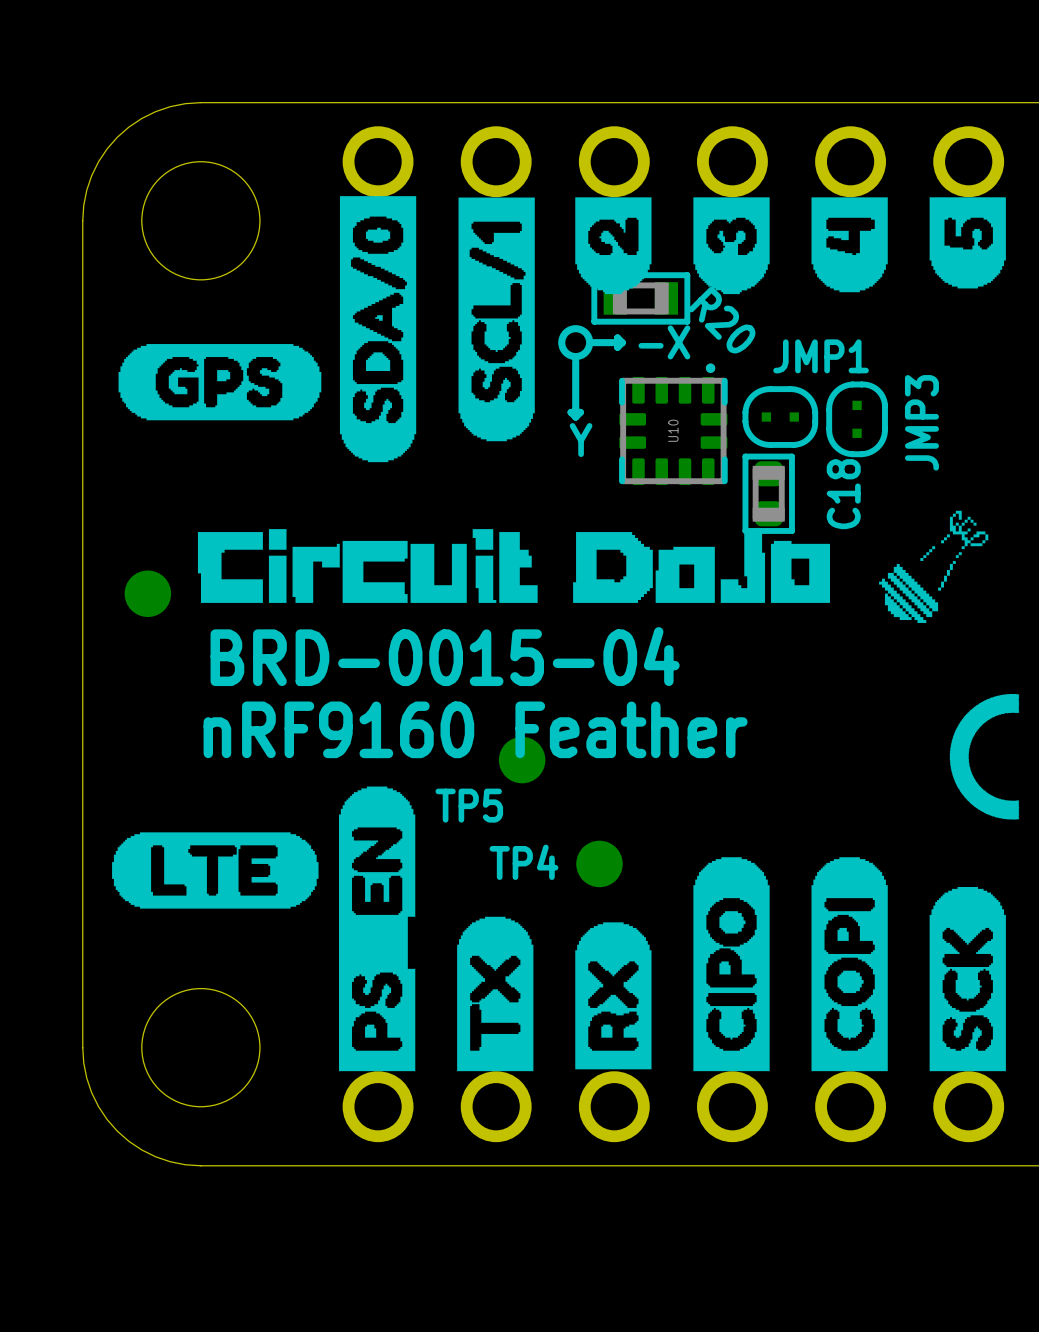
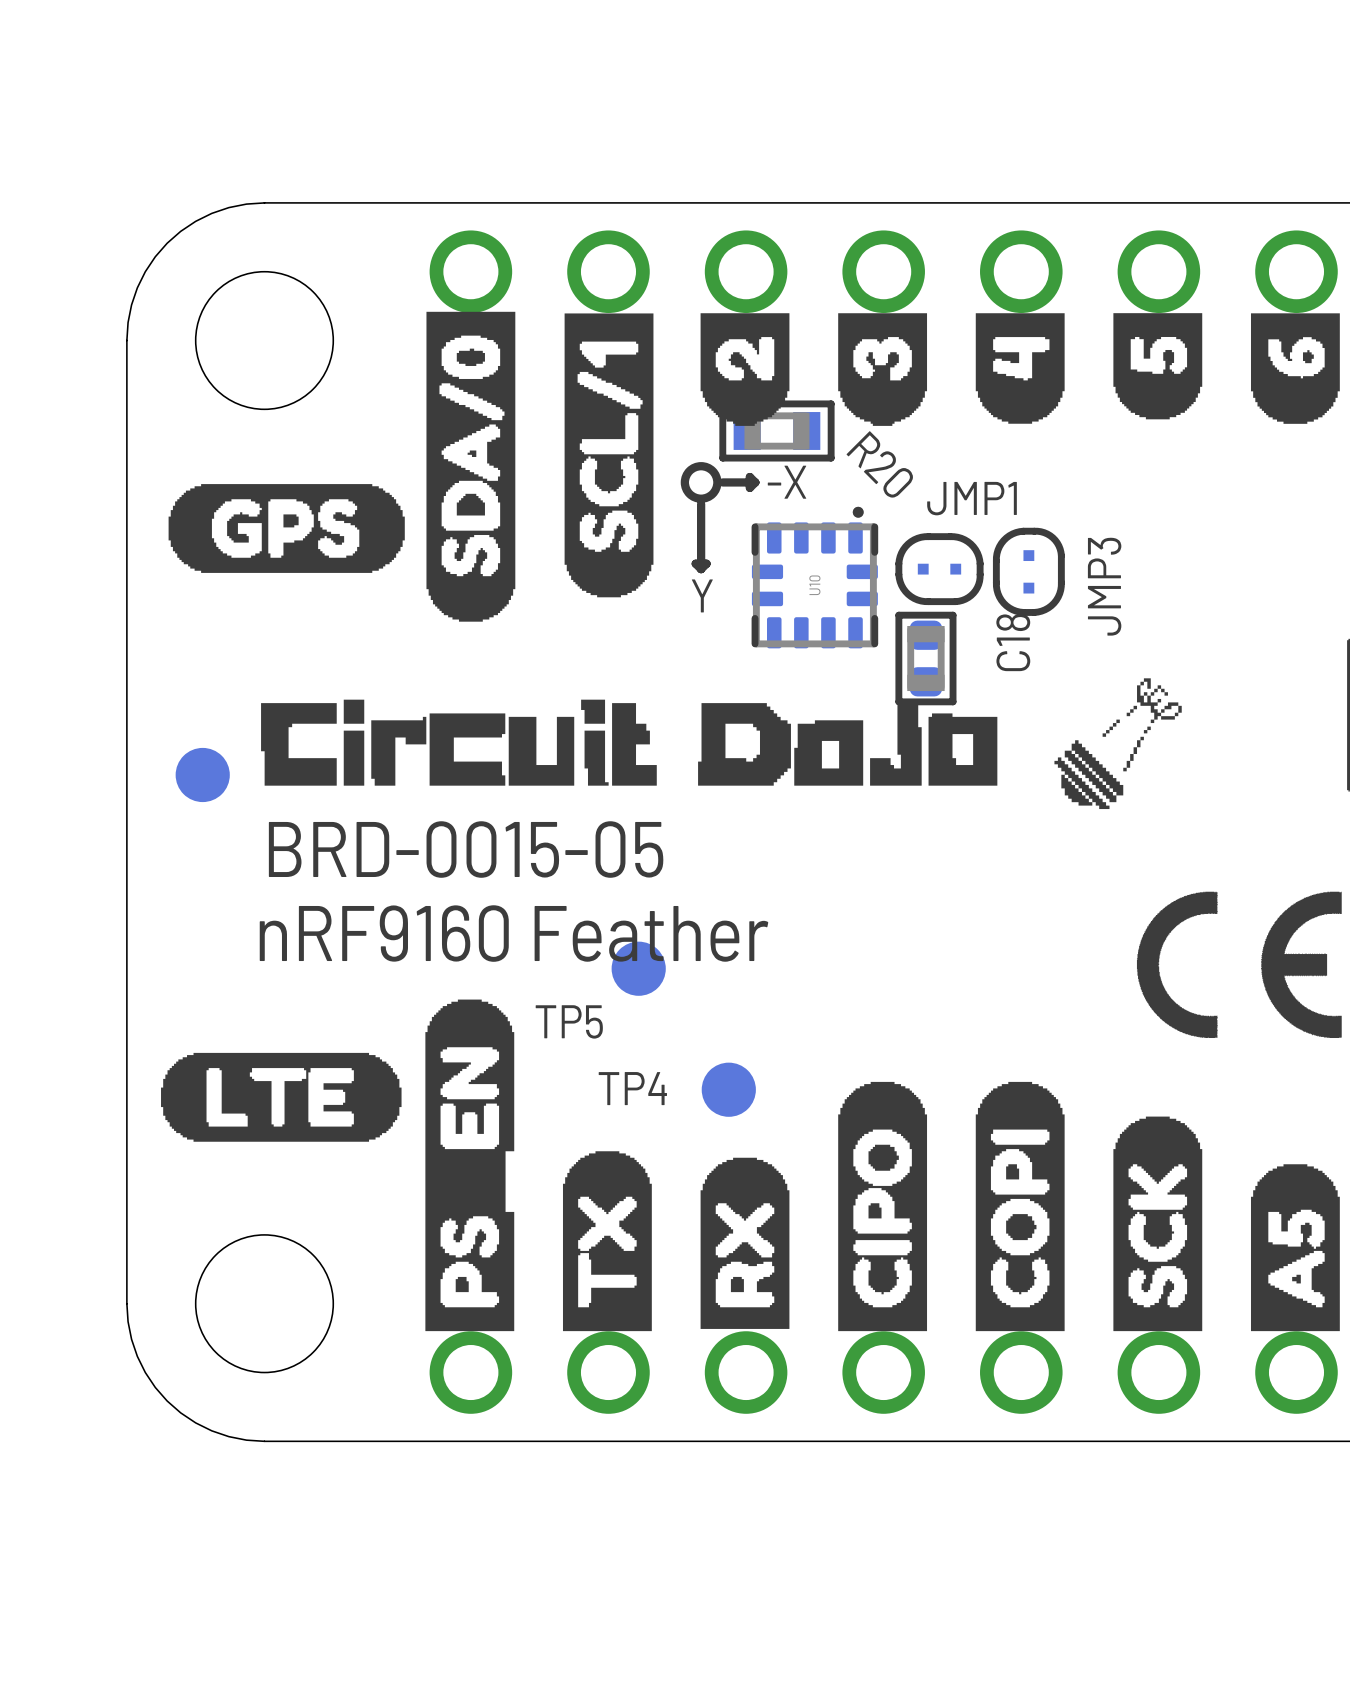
text: BRD-0015-04 (445, 656) -> BRD-0015-05 (466, 849)

